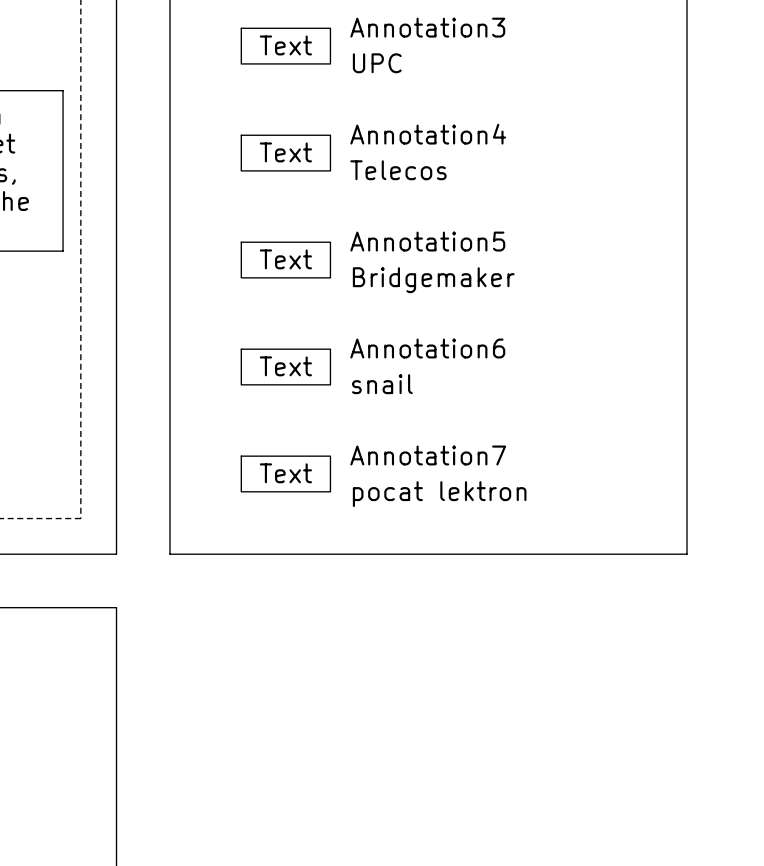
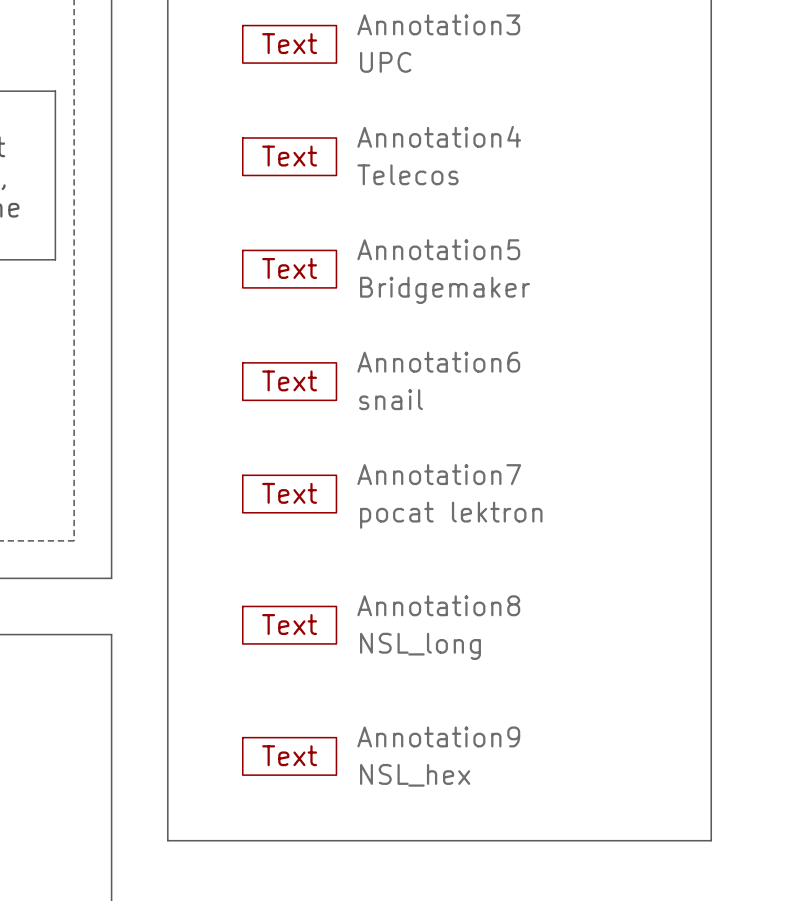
line: (170, 554) (686, 554) -> (167, 578) (167, 840) (711, 840) (711, 578)
Annotation8: none -> NSL_long (289, 625)
Annotation9: none -> NSL_hex (289, 756)

